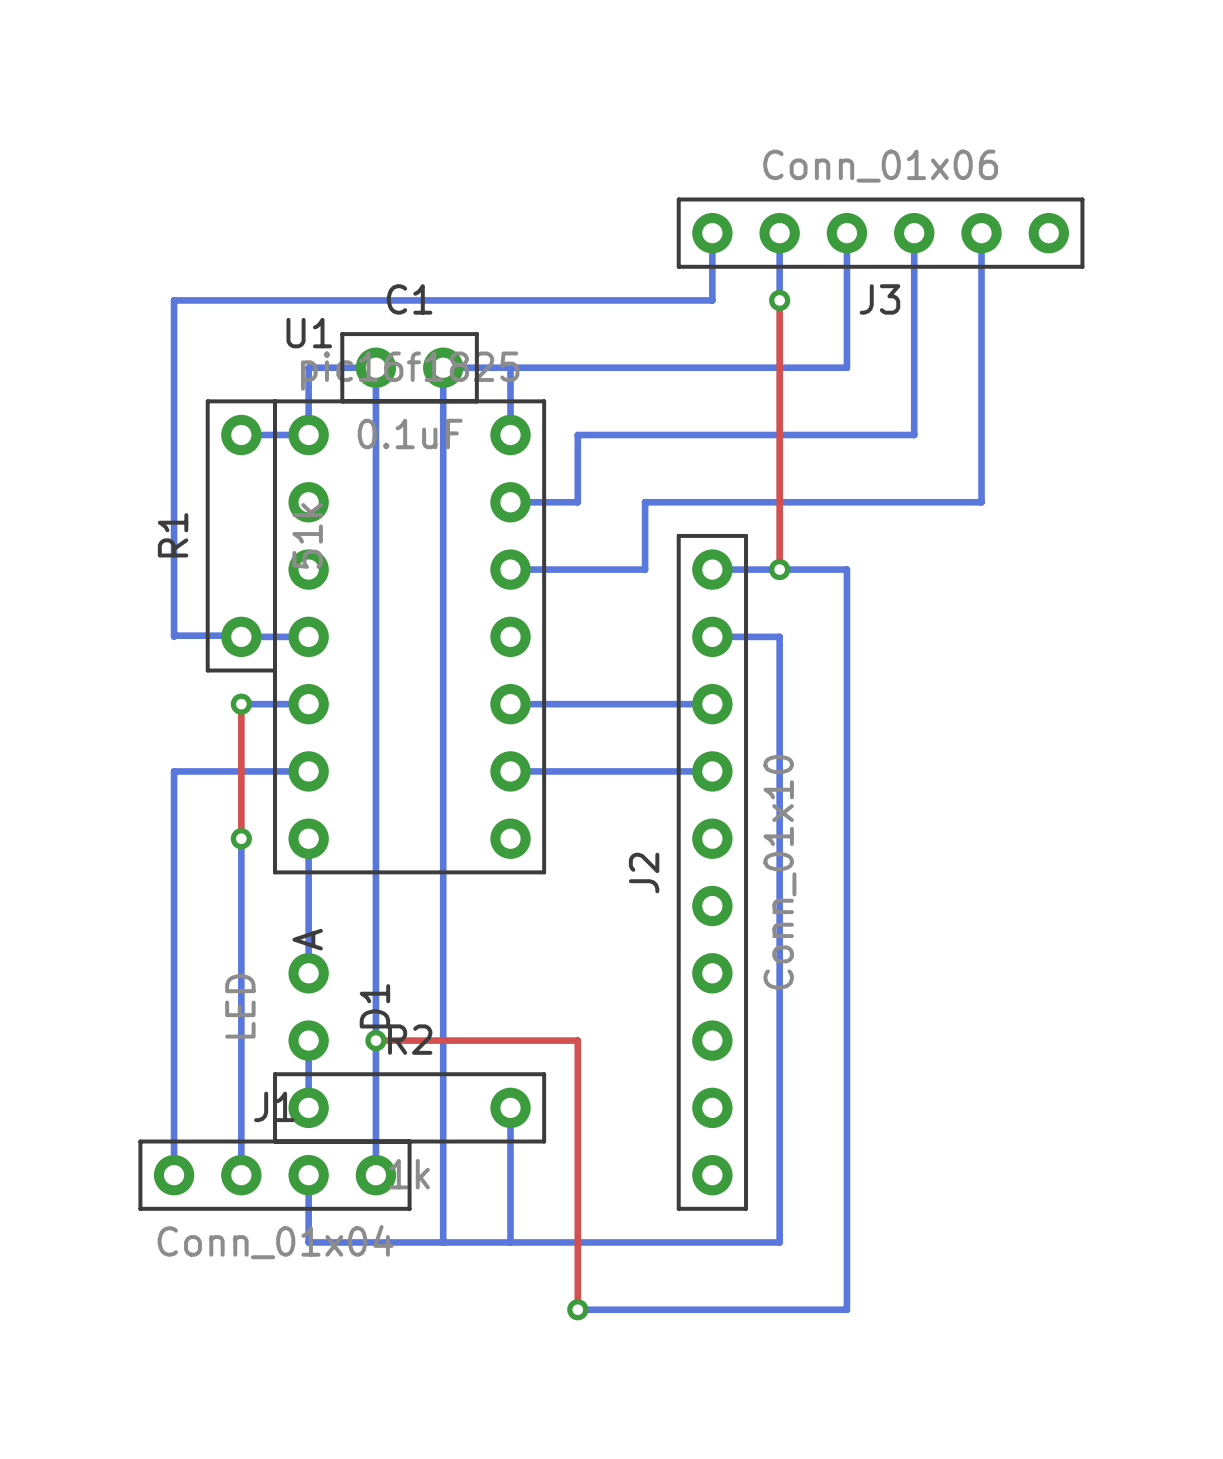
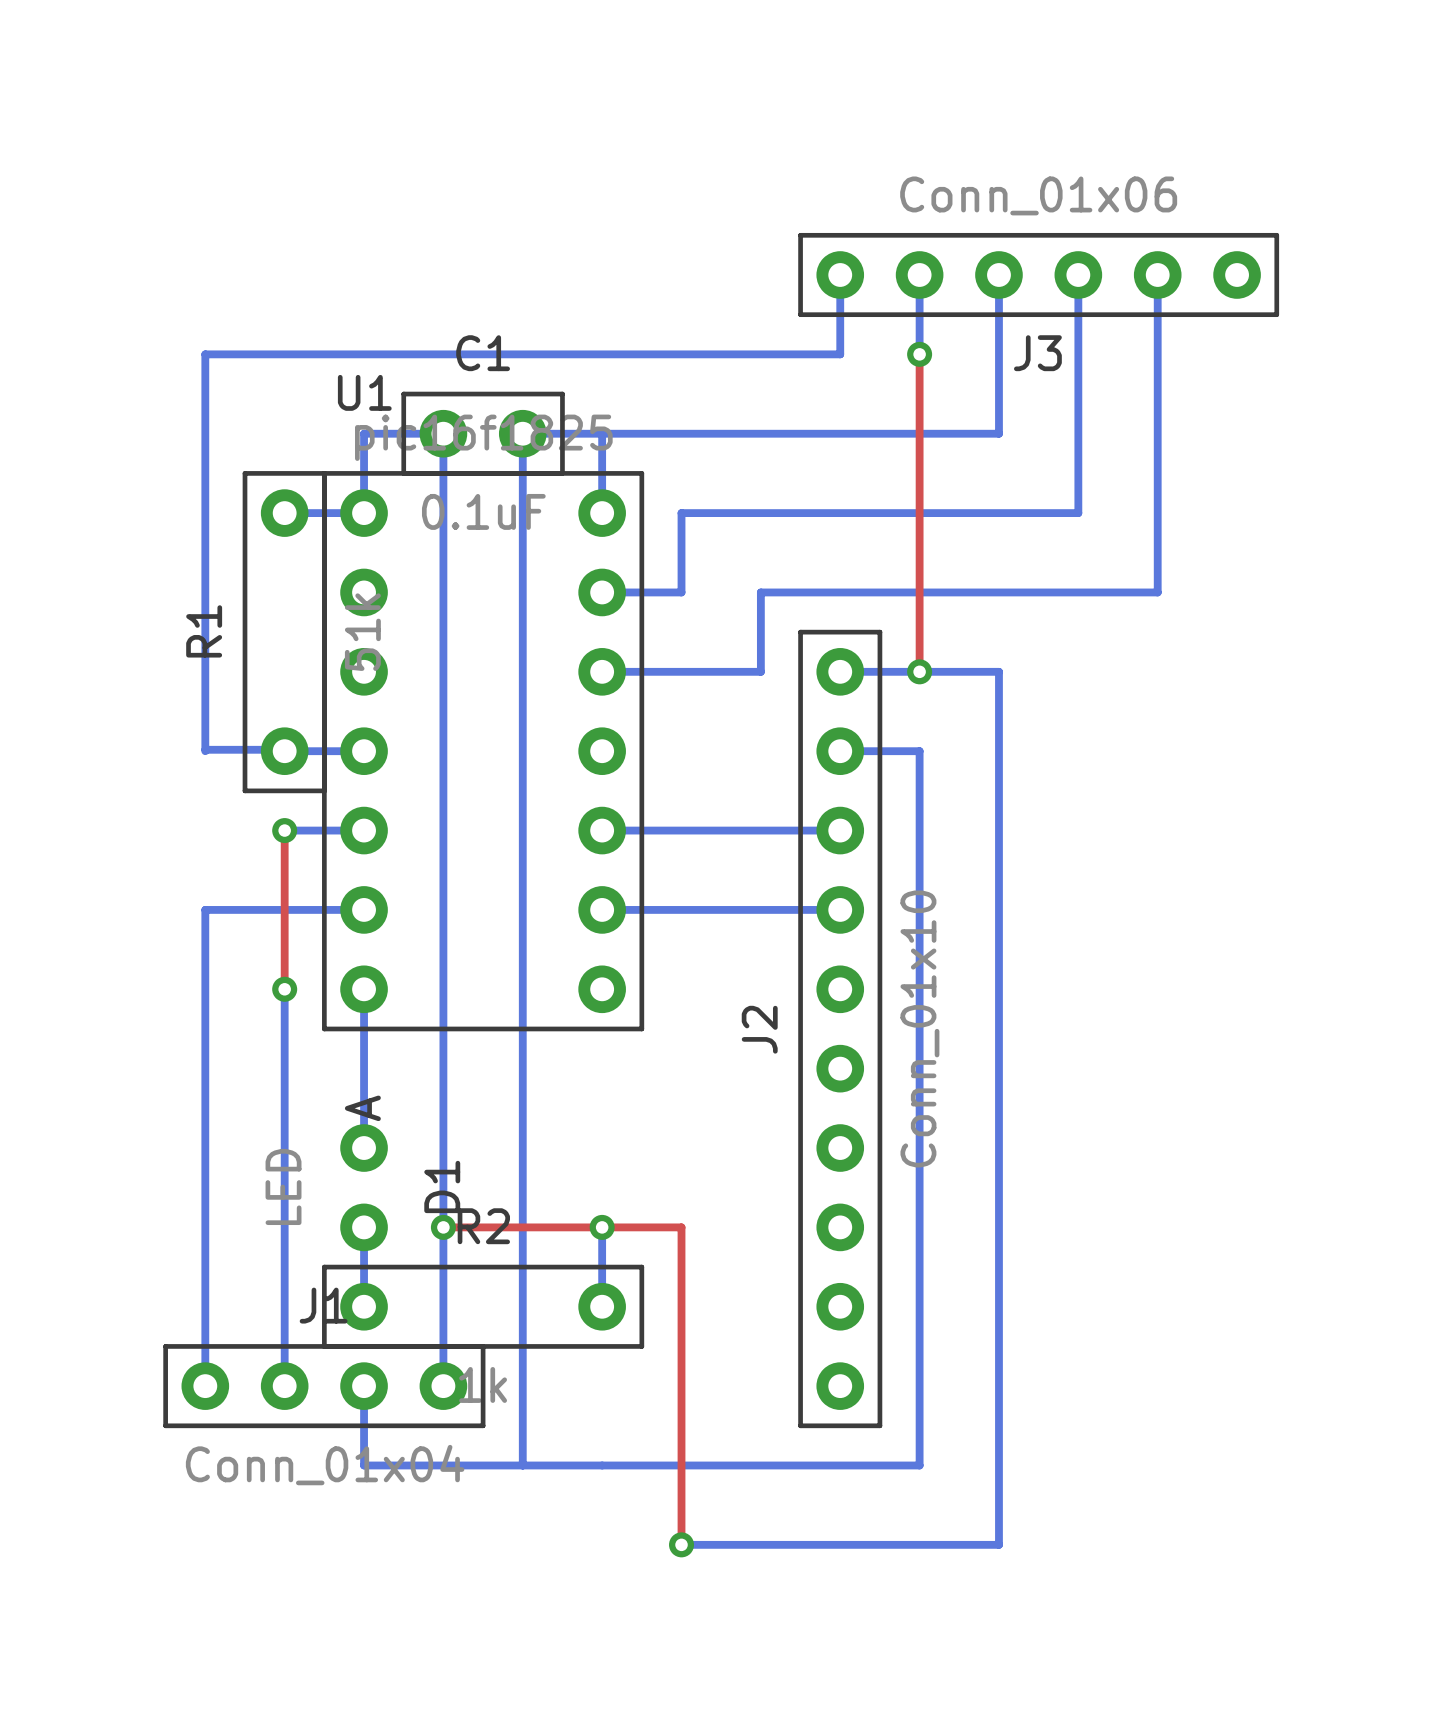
via: none -> (602, 1227)
bottom track: (510, 1107) (510, 1242) -> (602, 1306) (602, 1227)

